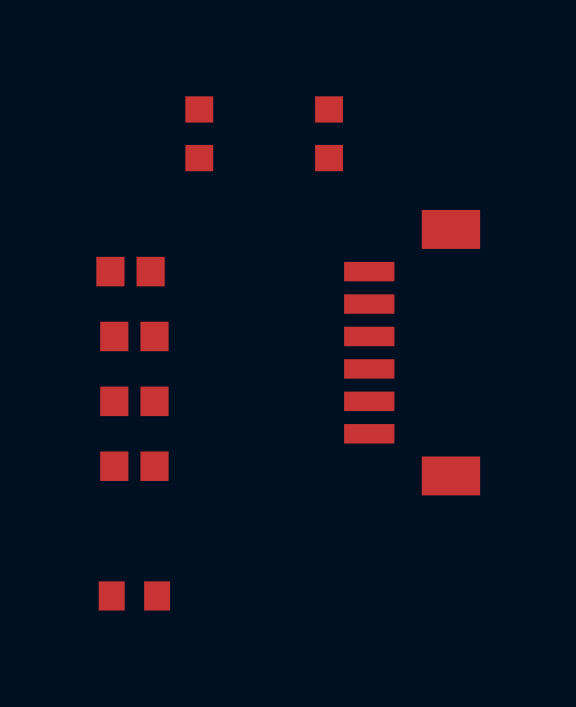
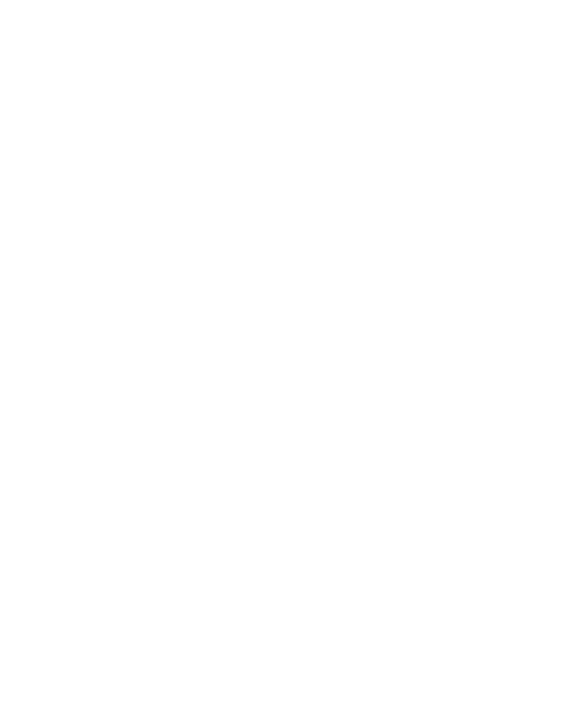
part: (199, 133) -> none
part: (329, 133) -> none
part: (130, 271) -> none
part: (134, 336) -> none
part: (412, 352) -> none
part: (134, 401) -> none
part: (134, 466) -> none
part: (134, 595) -> none

